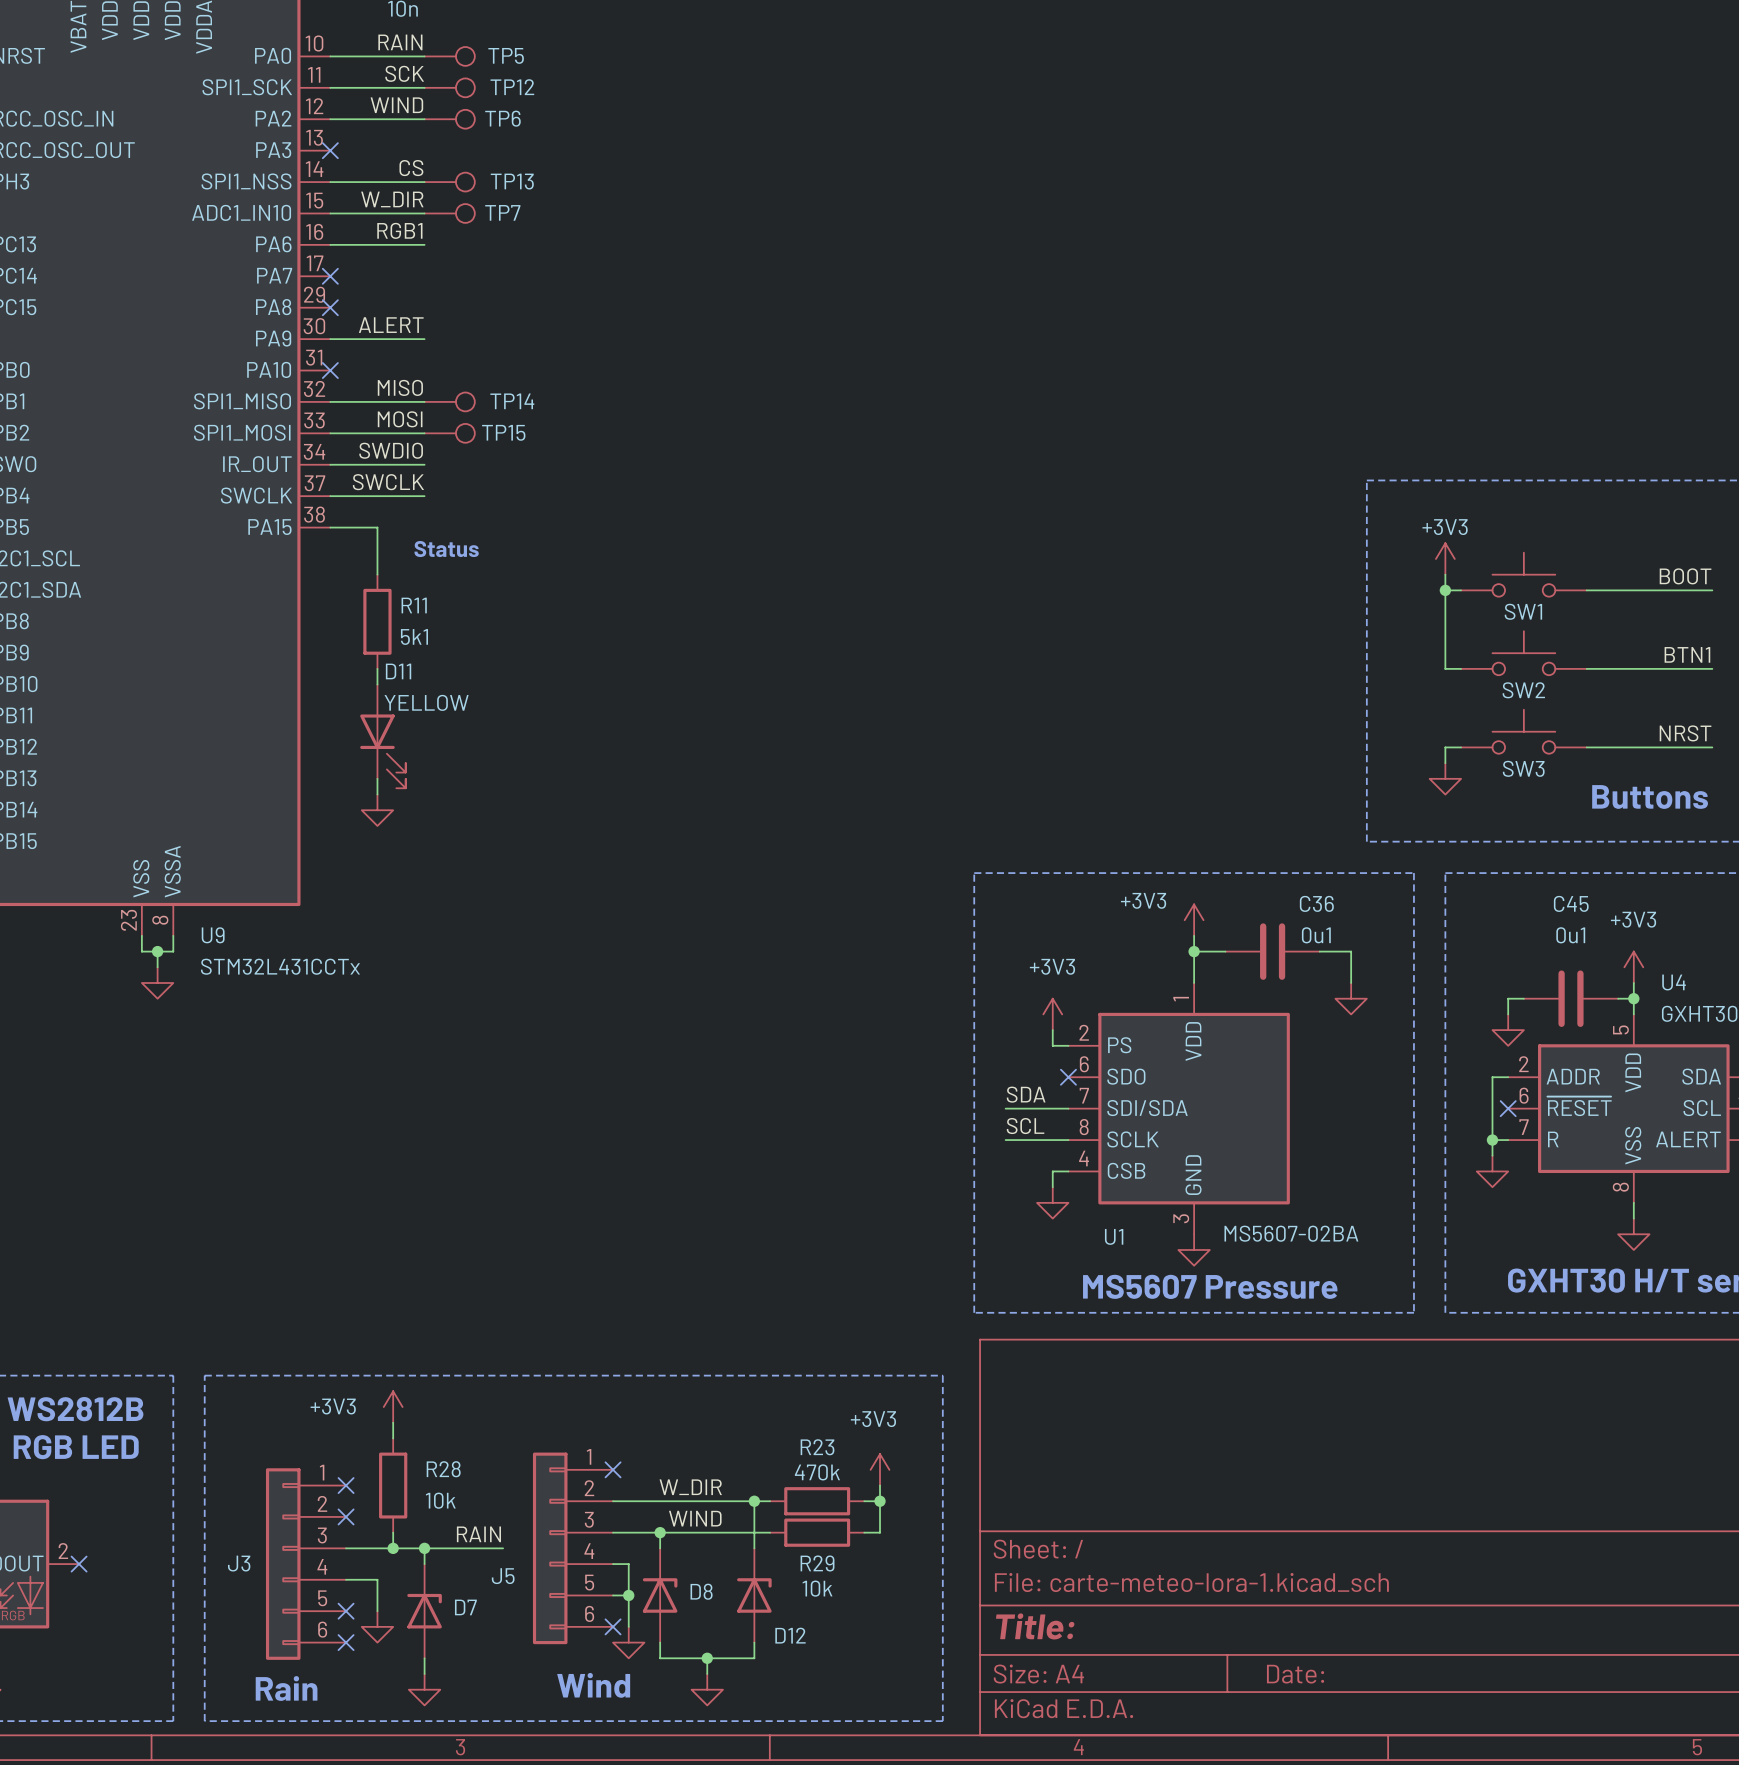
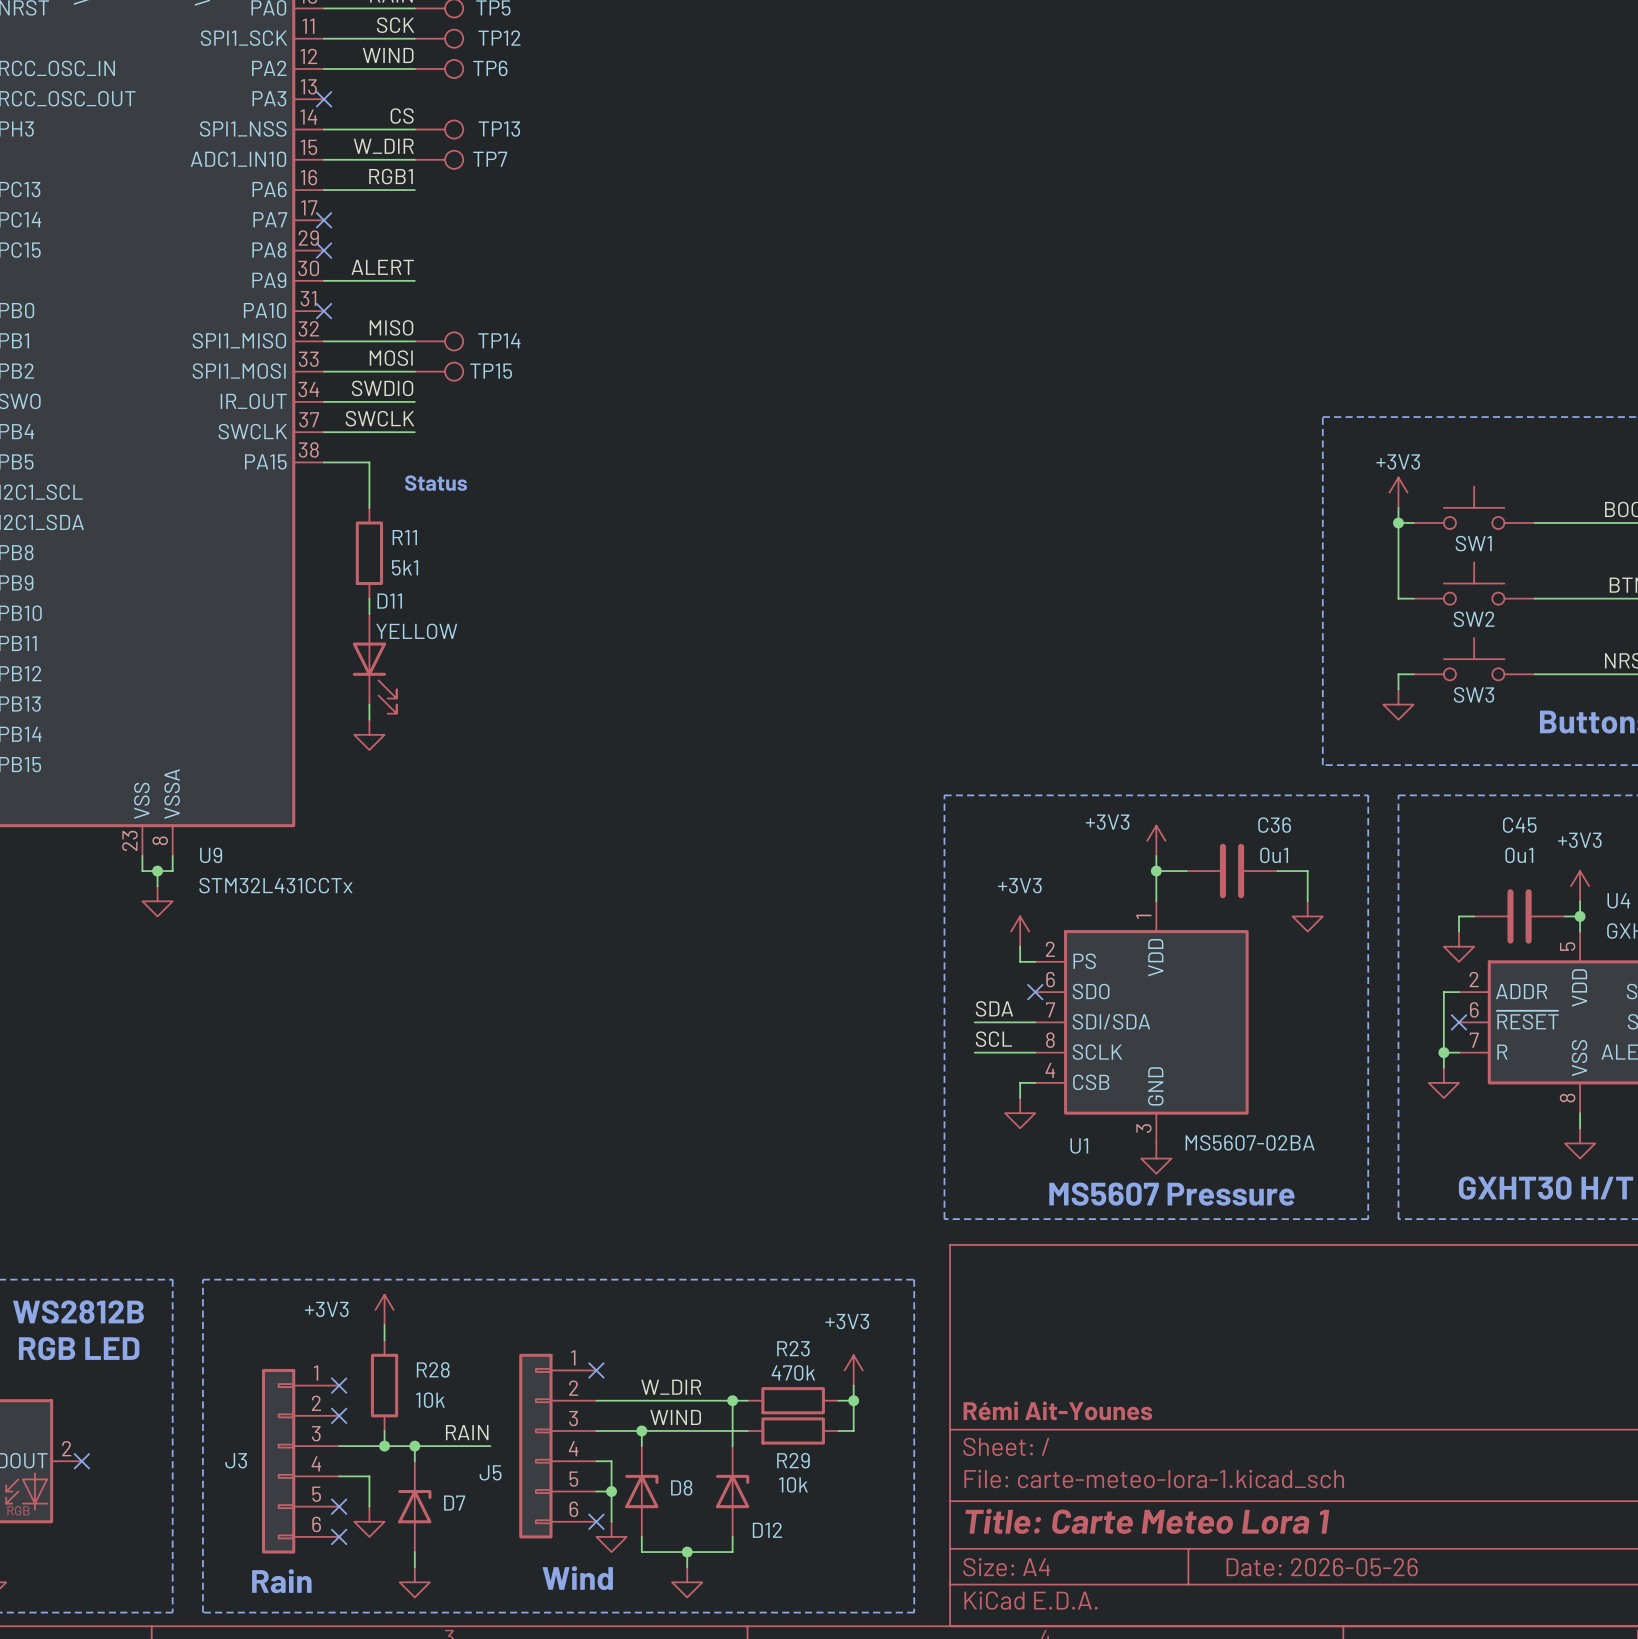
title block: none -> Rémi Ait-Younes (1057, 1410)
title block: Title: (1035, 1626) -> Title: Carte Meteo Lora 1 (1147, 1521)
title block: Date: (1295, 1674) -> Date: 2026-05-26 (1322, 1567)

